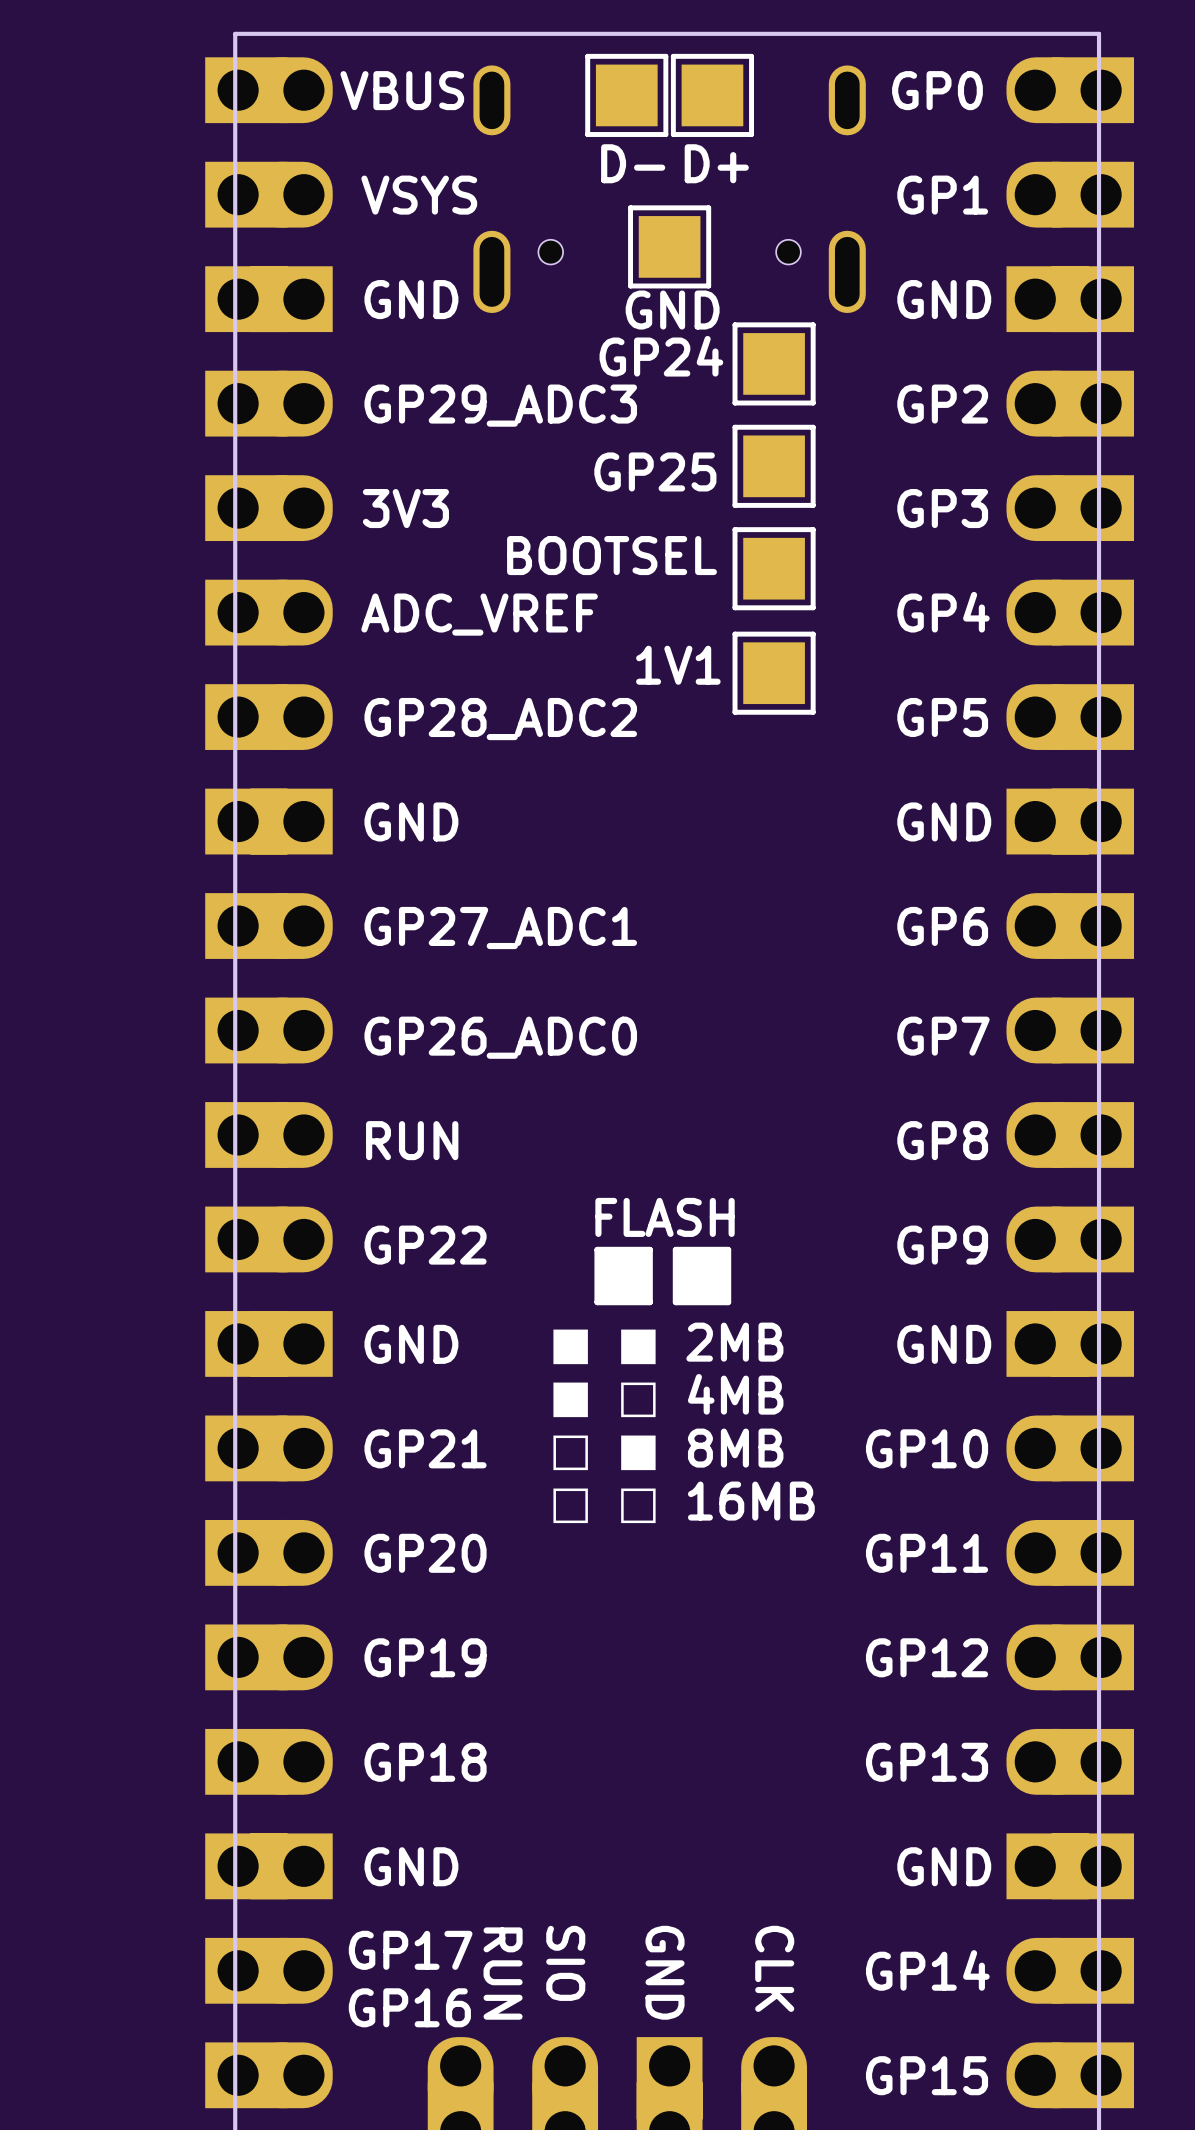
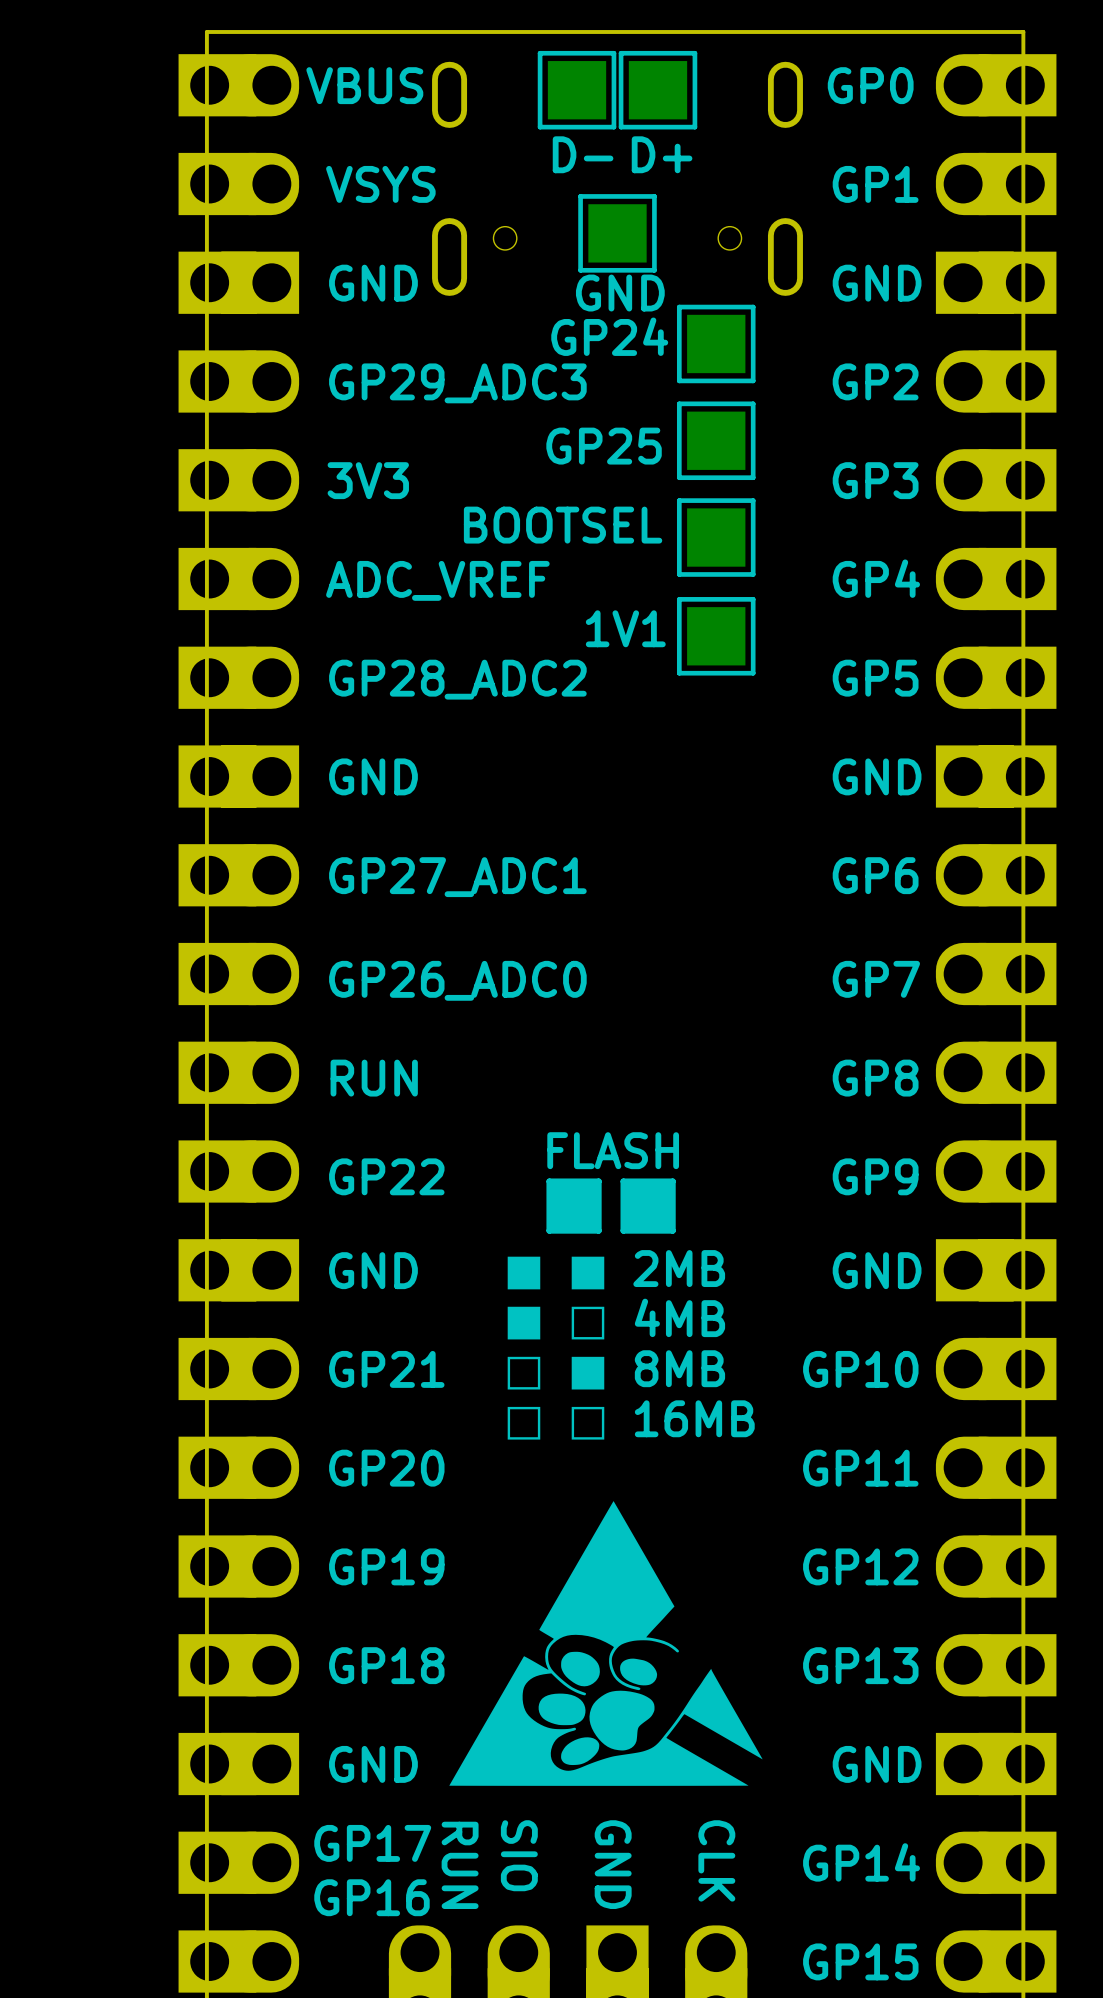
drawing: none -> [449, 1501, 763, 1786]

